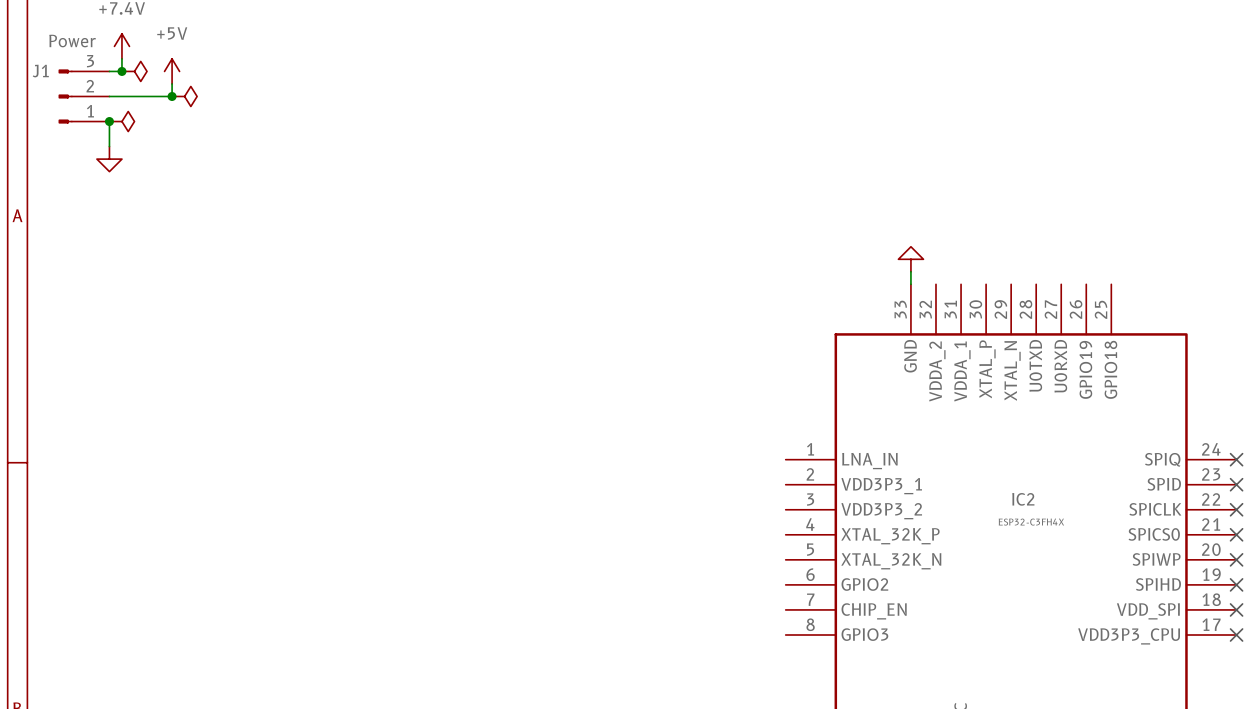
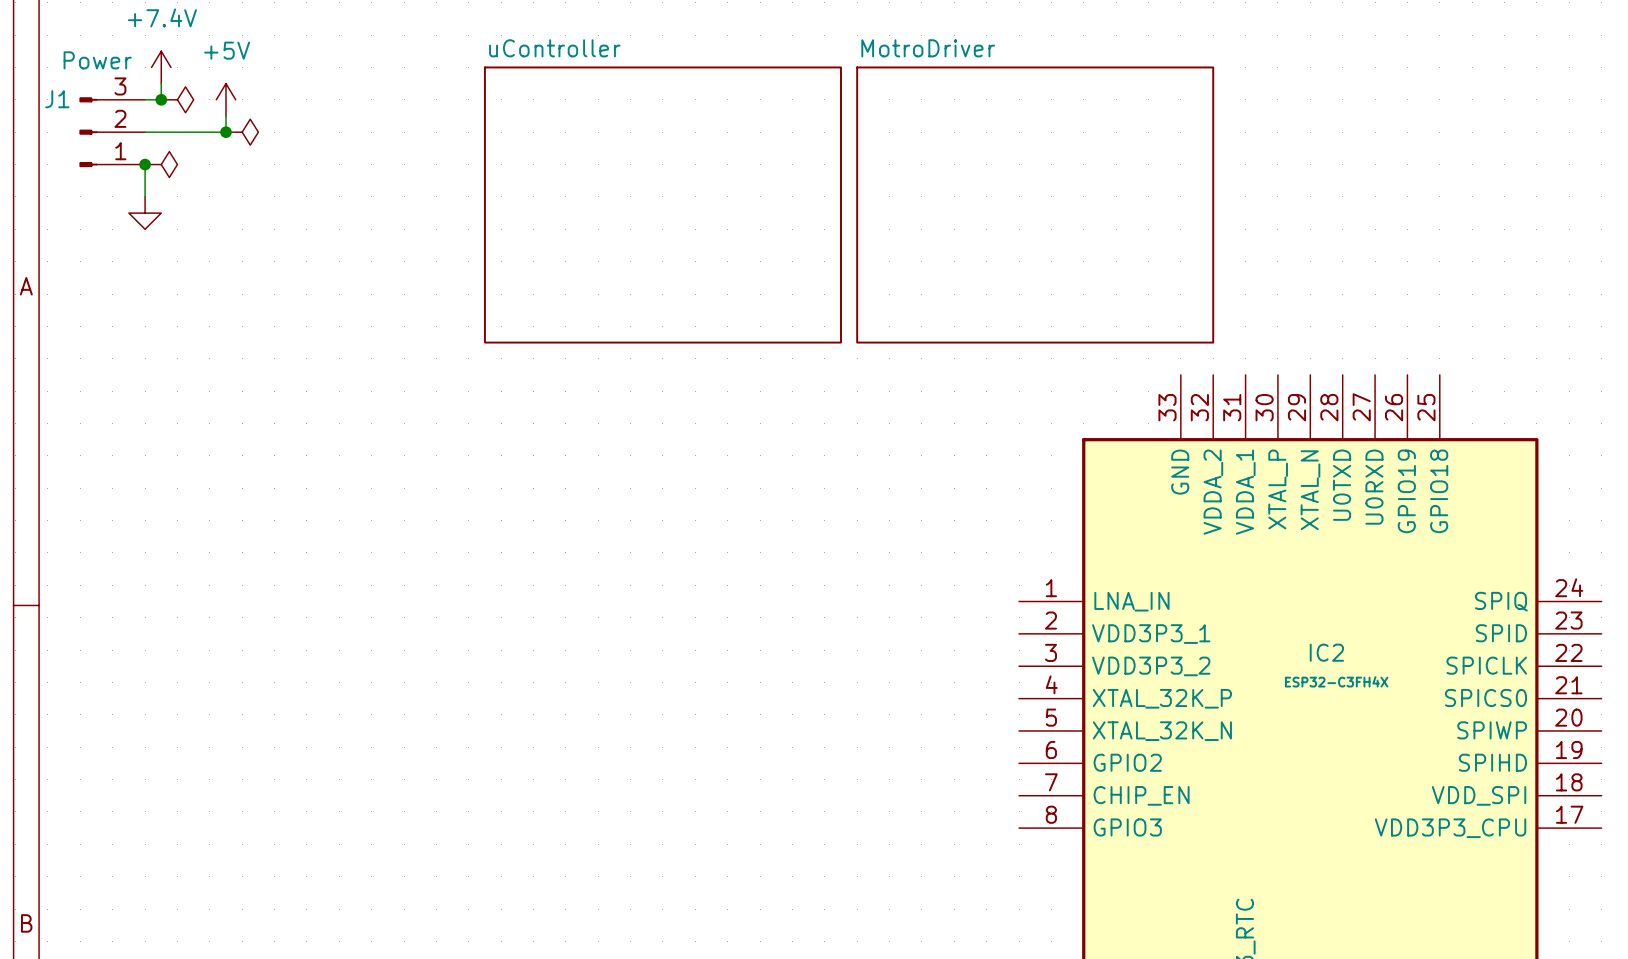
sheet uController: none -> (662, 205)
sheet MotroDriver: none -> (1035, 205)
power symbol: (910, 259) -> none
wire: (910, 271) (910, 284) -> none
no-connect mark: (1236, 459) -> none
no-connect mark: (1236, 484) -> none
no-connect mark: (1236, 509) -> none
no-connect mark: (1236, 534) -> none
no-connect mark: (1236, 559) -> none
no-connect mark: (1236, 584) -> none
no-connect mark: (1236, 609) -> none
no-connect mark: (1236, 635) -> none

